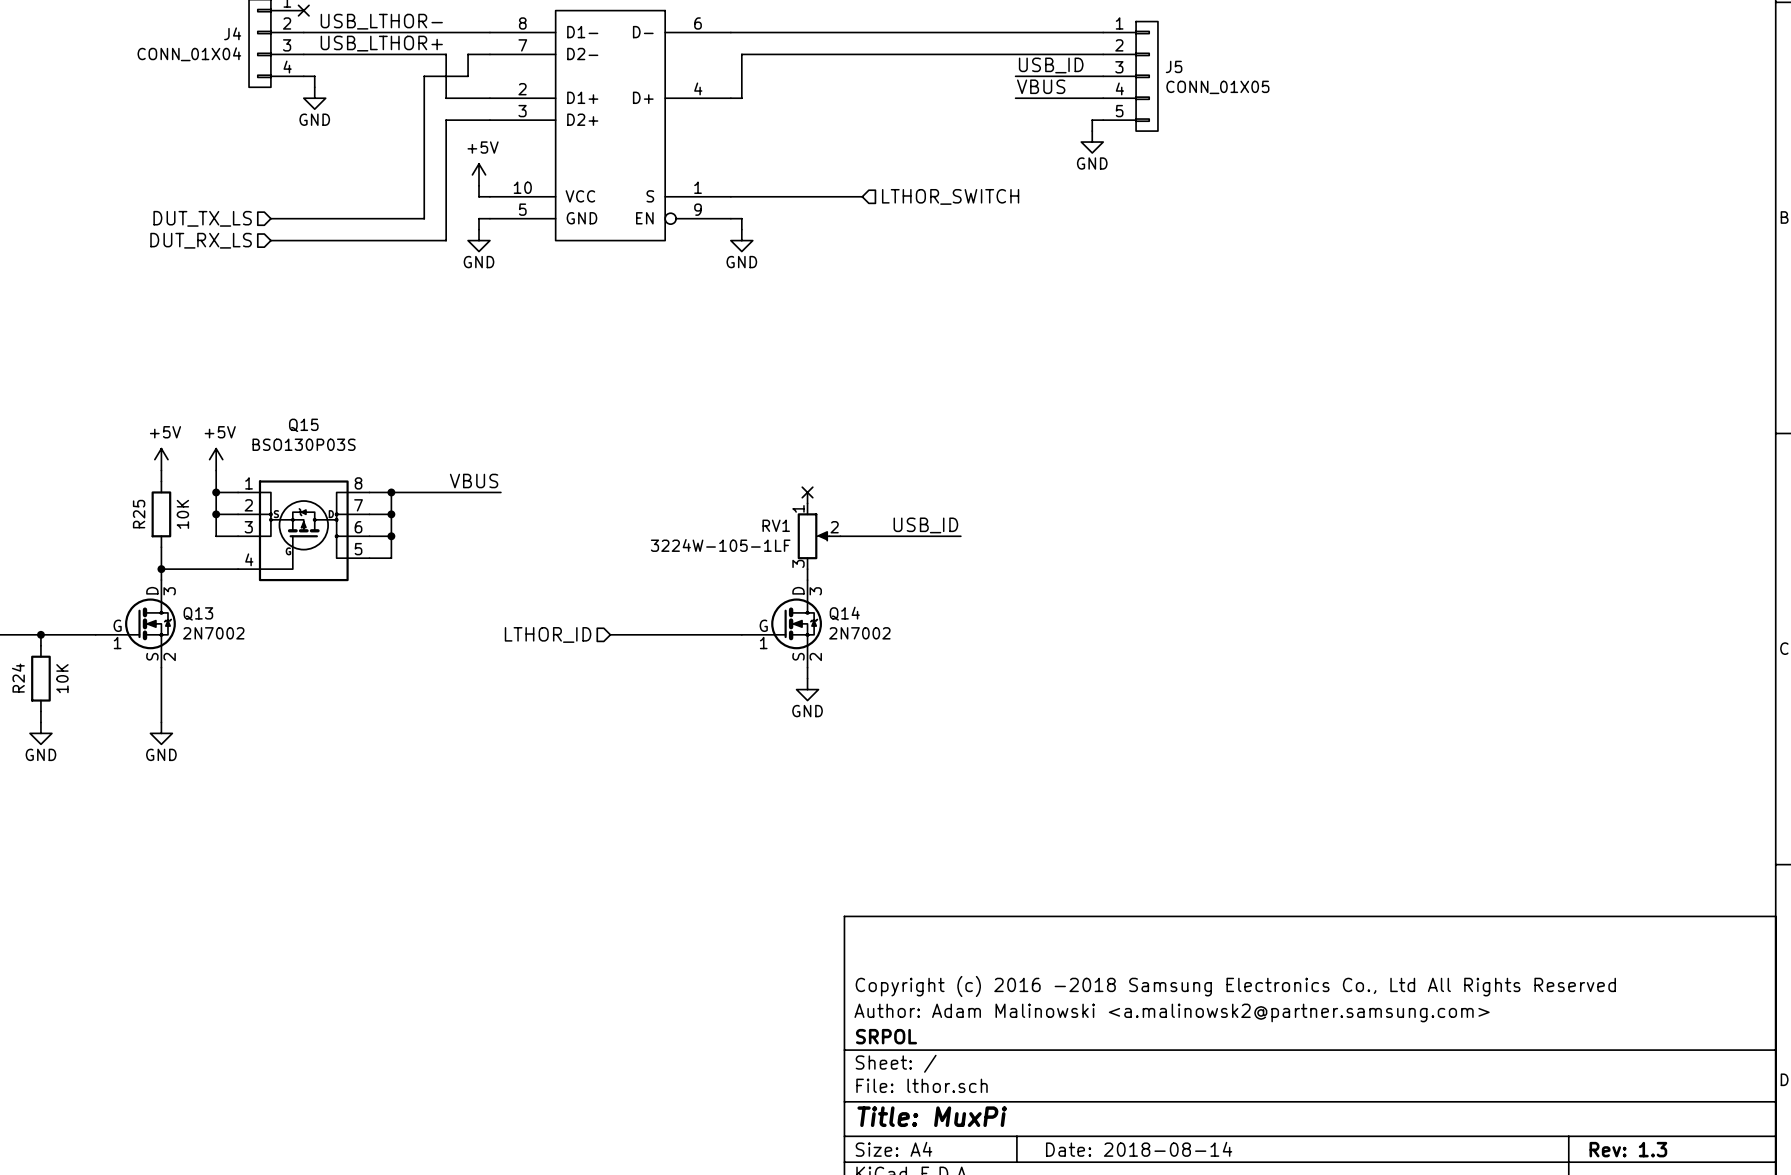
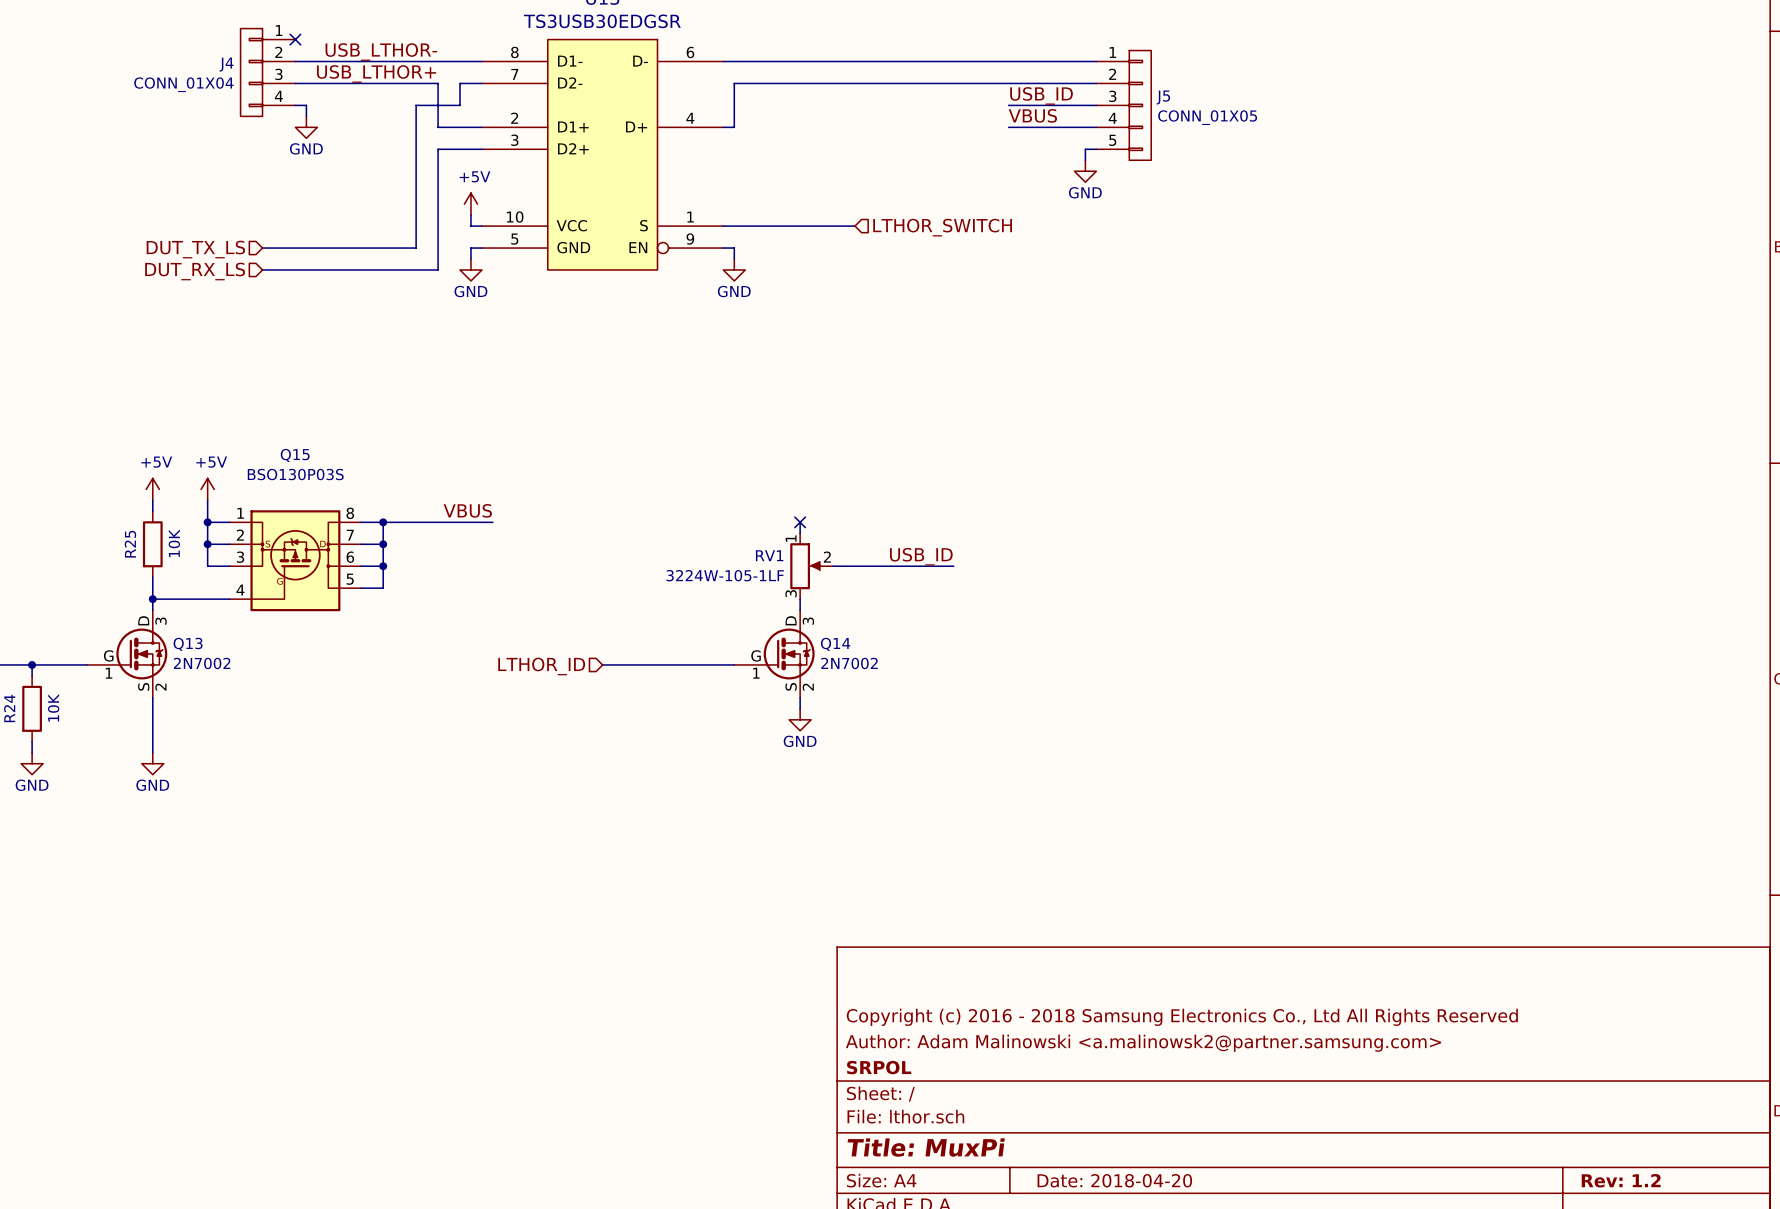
title block: Copyright (c) 2016 -2018 Samsung Electronics Co., Ltd All Rights Reserved (1235, 986) -> Copyright (c) 2016 - 2018 Samsung Electronics Co., Ltd All Rights Reserved (1182, 1017)
title block: Date: 2018-08-14 (1139, 1149) -> Date: 2018-04-20 (1114, 1180)
title block: Rev: 1.3 (1628, 1149) -> Rev: 1.2 (1621, 1180)

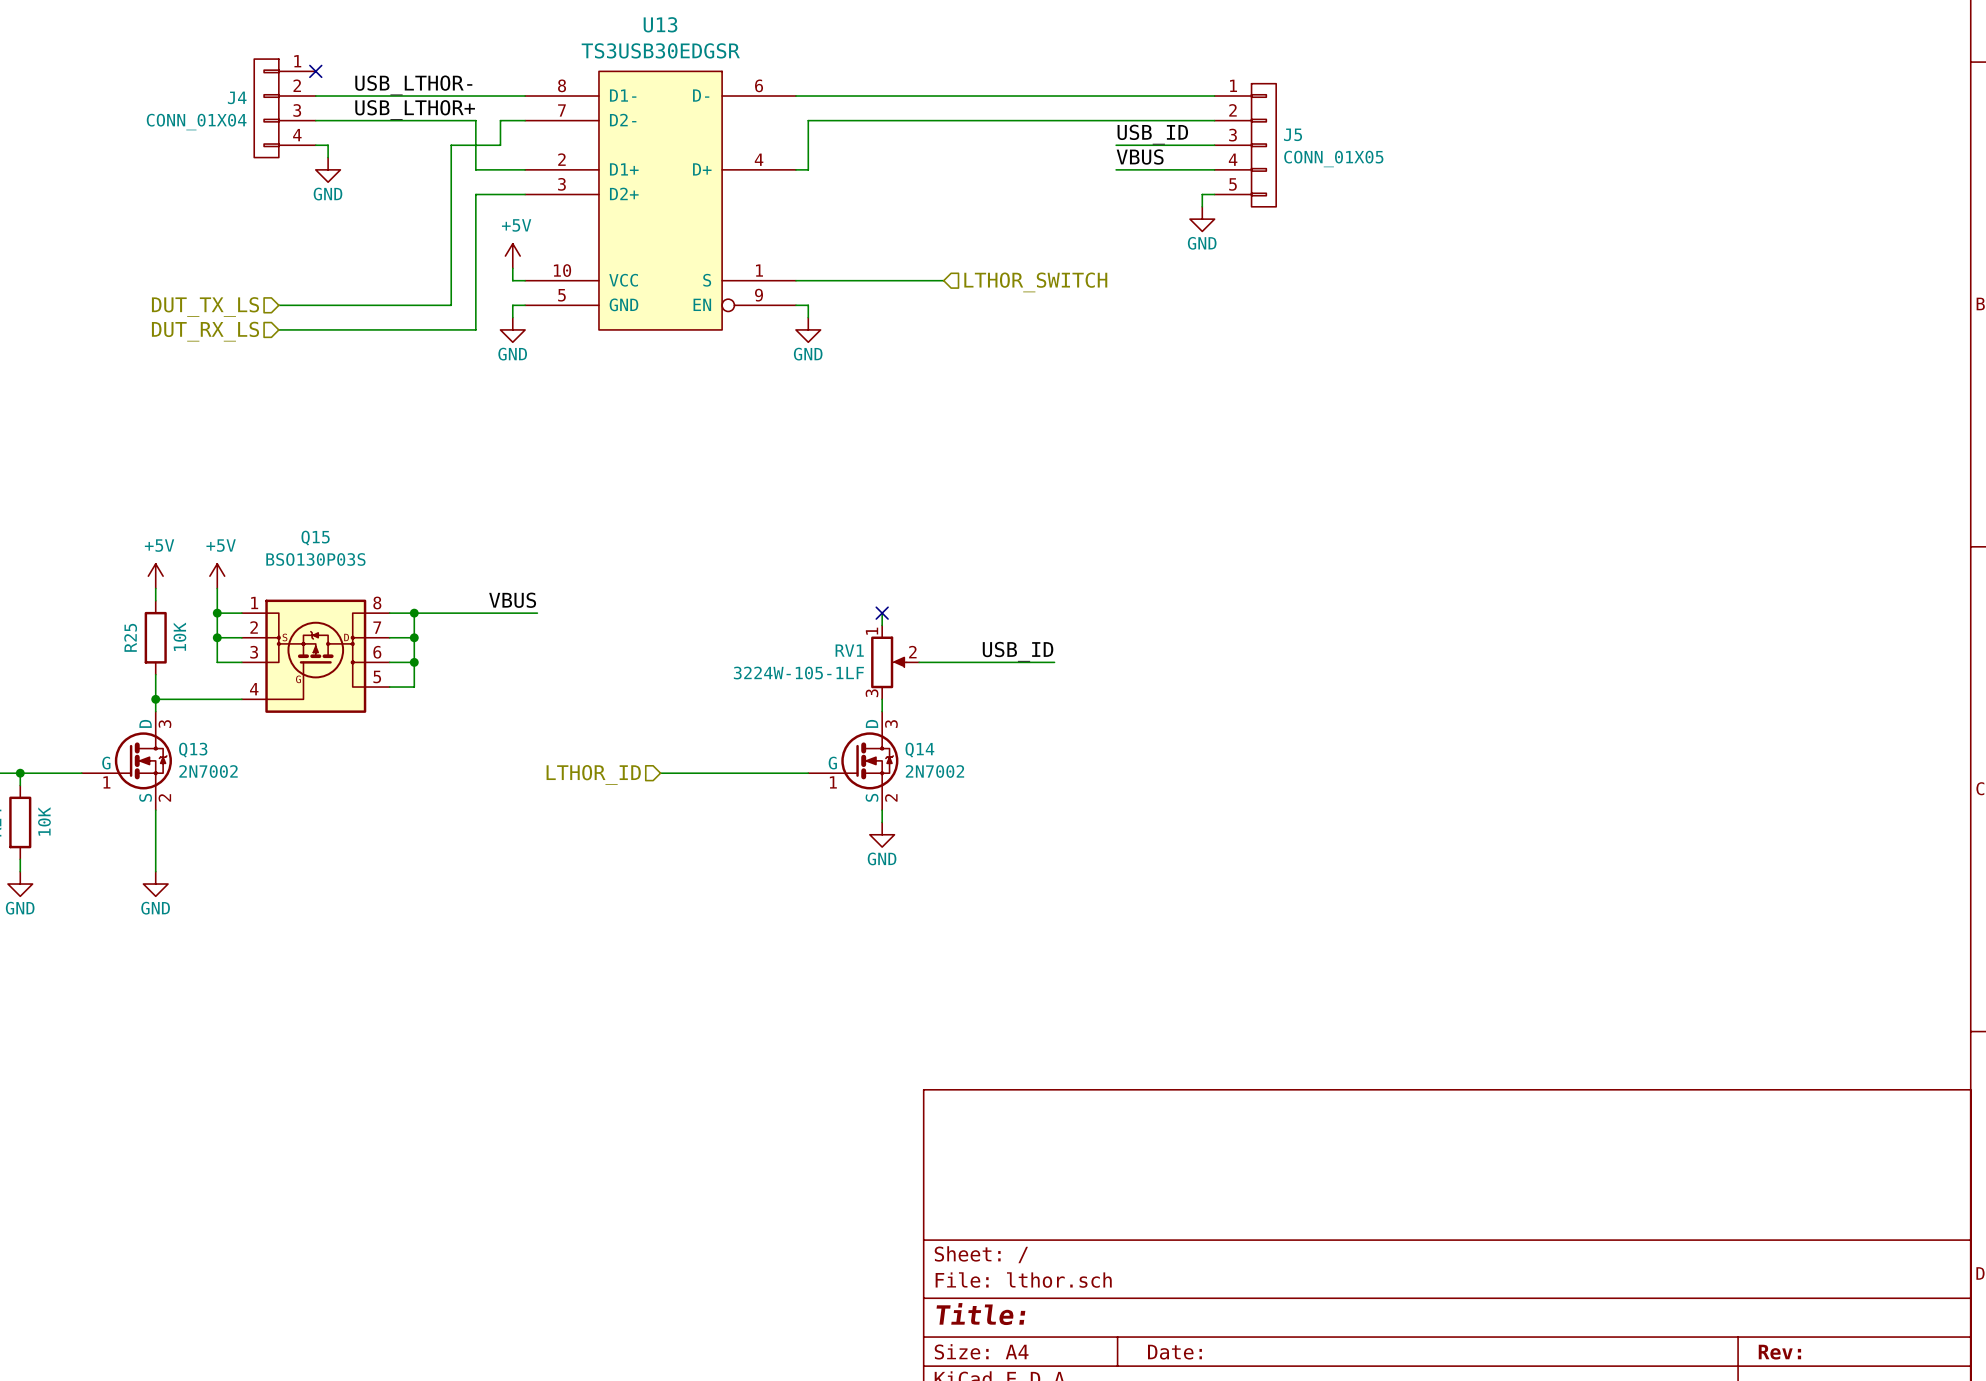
title block: Copyright (c) 2016 - 2018 Samsung Electronics Co., Ltd All Rights Reserved (1182, 1017) -> none
title block: Author: Adam Malinowski <a.malinowsk2@partner.samsung.com> (1143, 1043) -> none
title block: SRPOL (879, 1067) -> none
title block: Title: MuxPi (926, 1147) -> Title: (980, 1314)
title block: Date: 2018-04-20 (1114, 1180) -> Date: (1174, 1352)
title block: Rev: 1.2 (1621, 1180) -> Rev: (1779, 1352)

